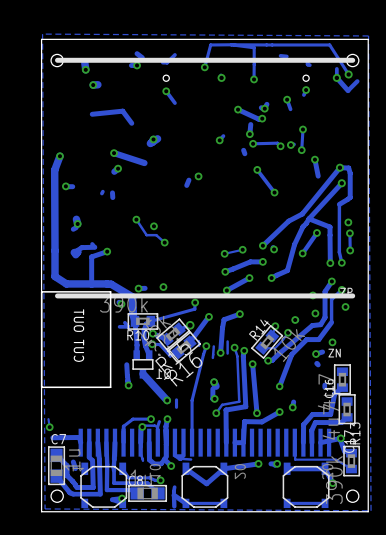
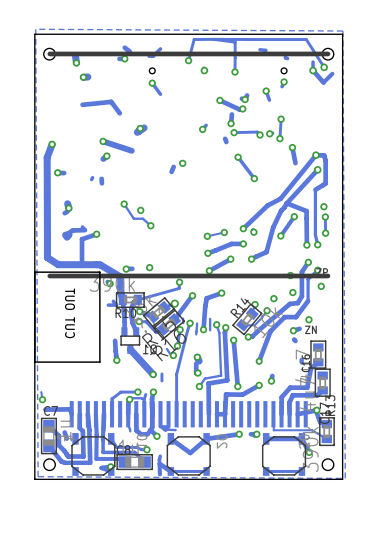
track: none -> (180, 329) (177, 346)
via: none -> (180, 329)
via: none -> (177, 346)
track: none -> (166, 349) (172, 357) (173, 355)
via: none -> (173, 355)

